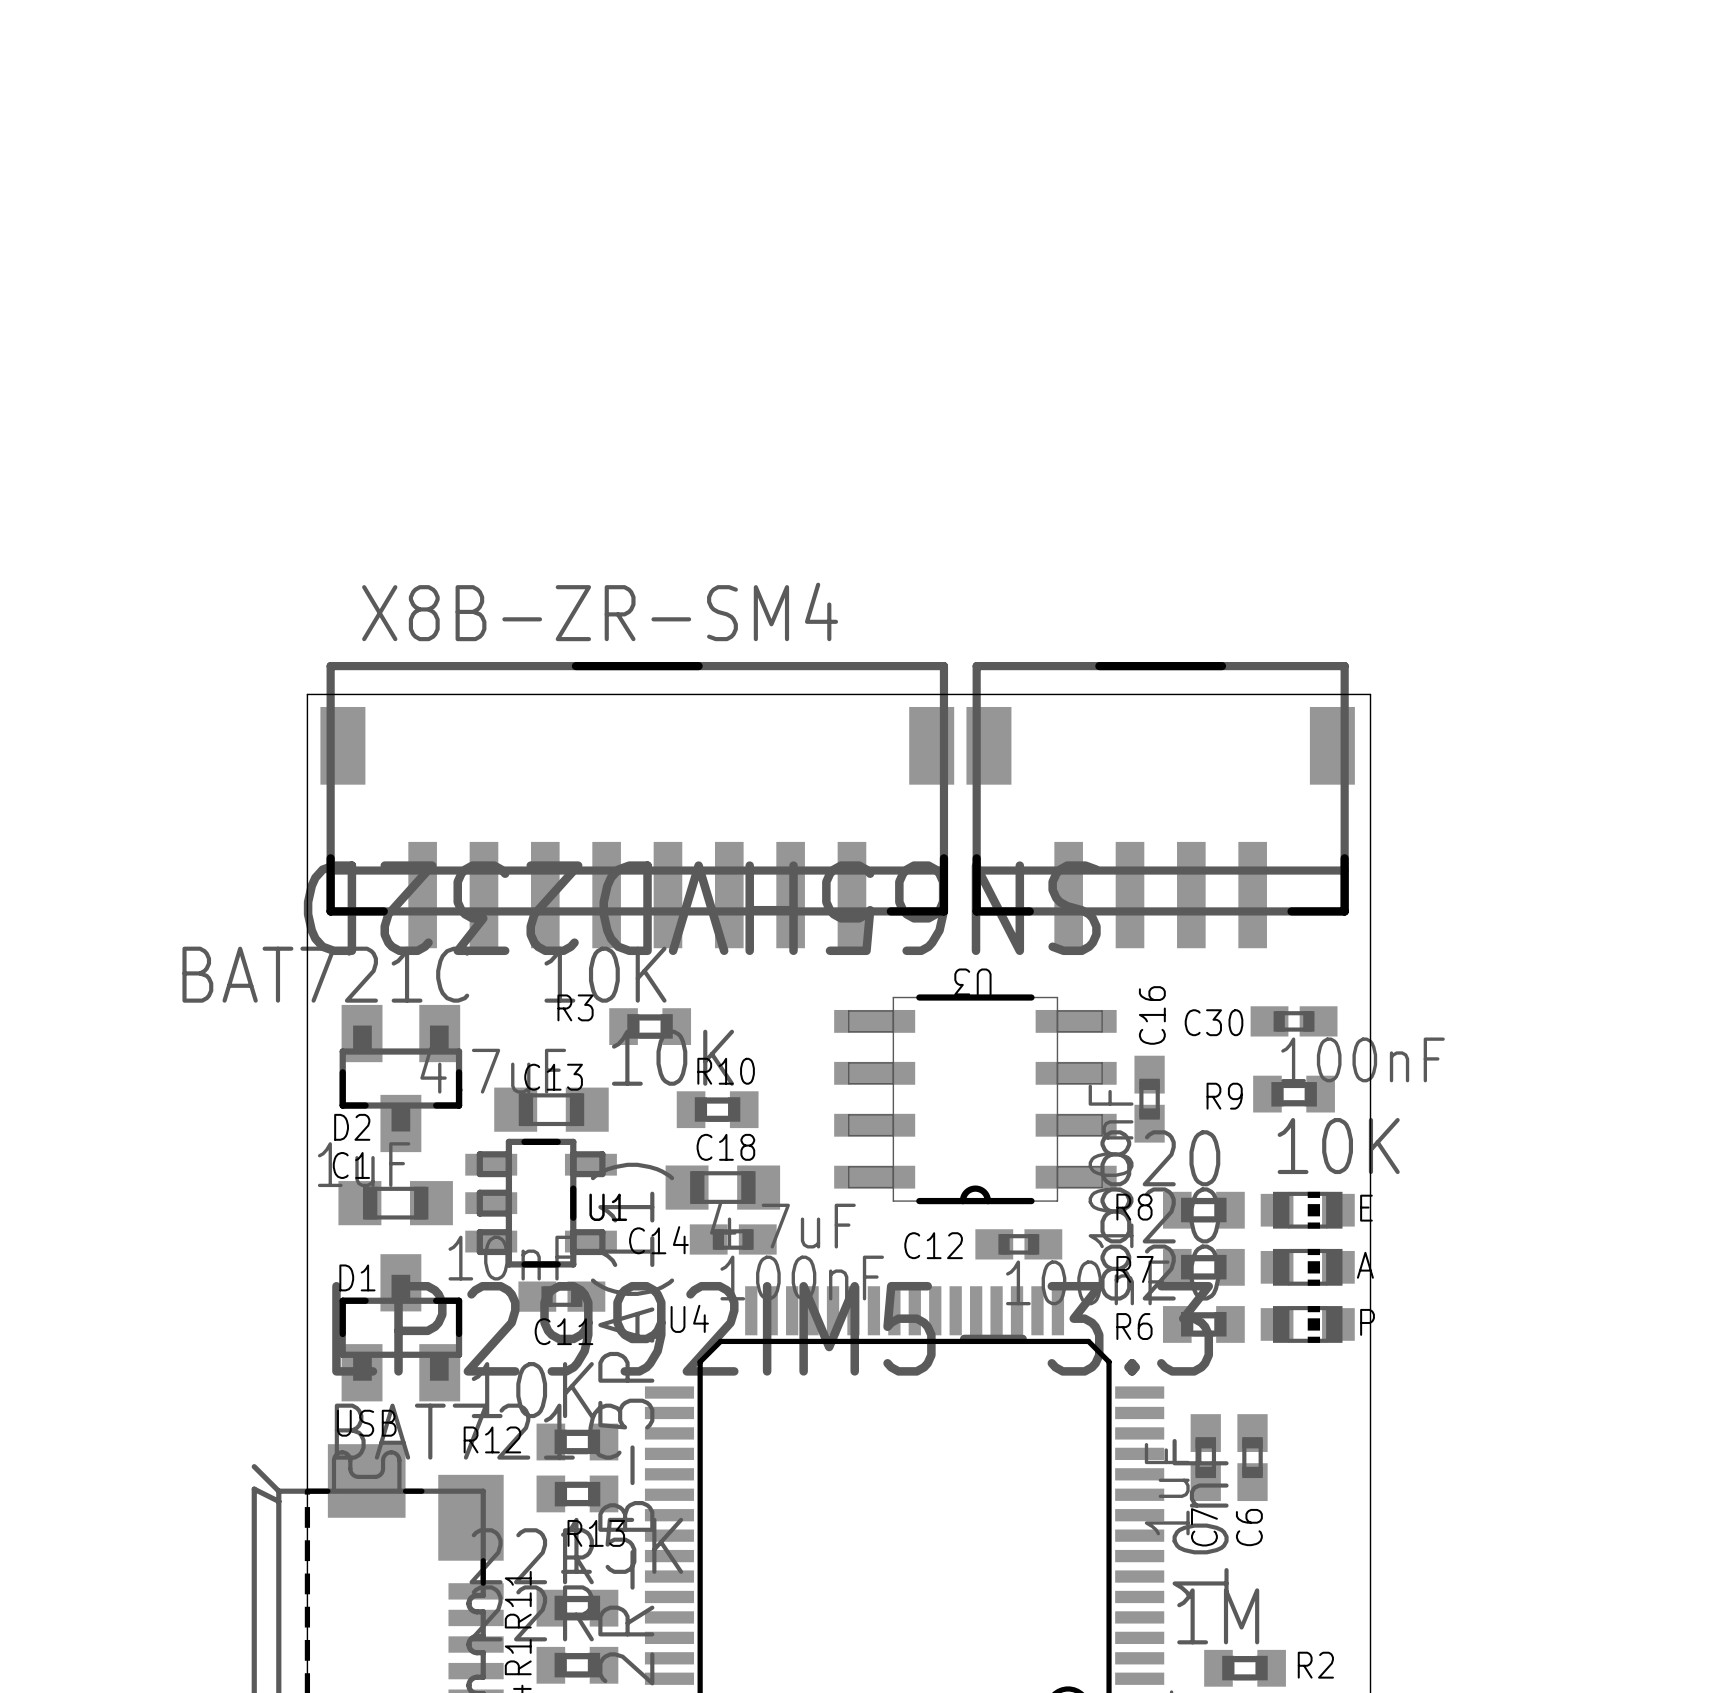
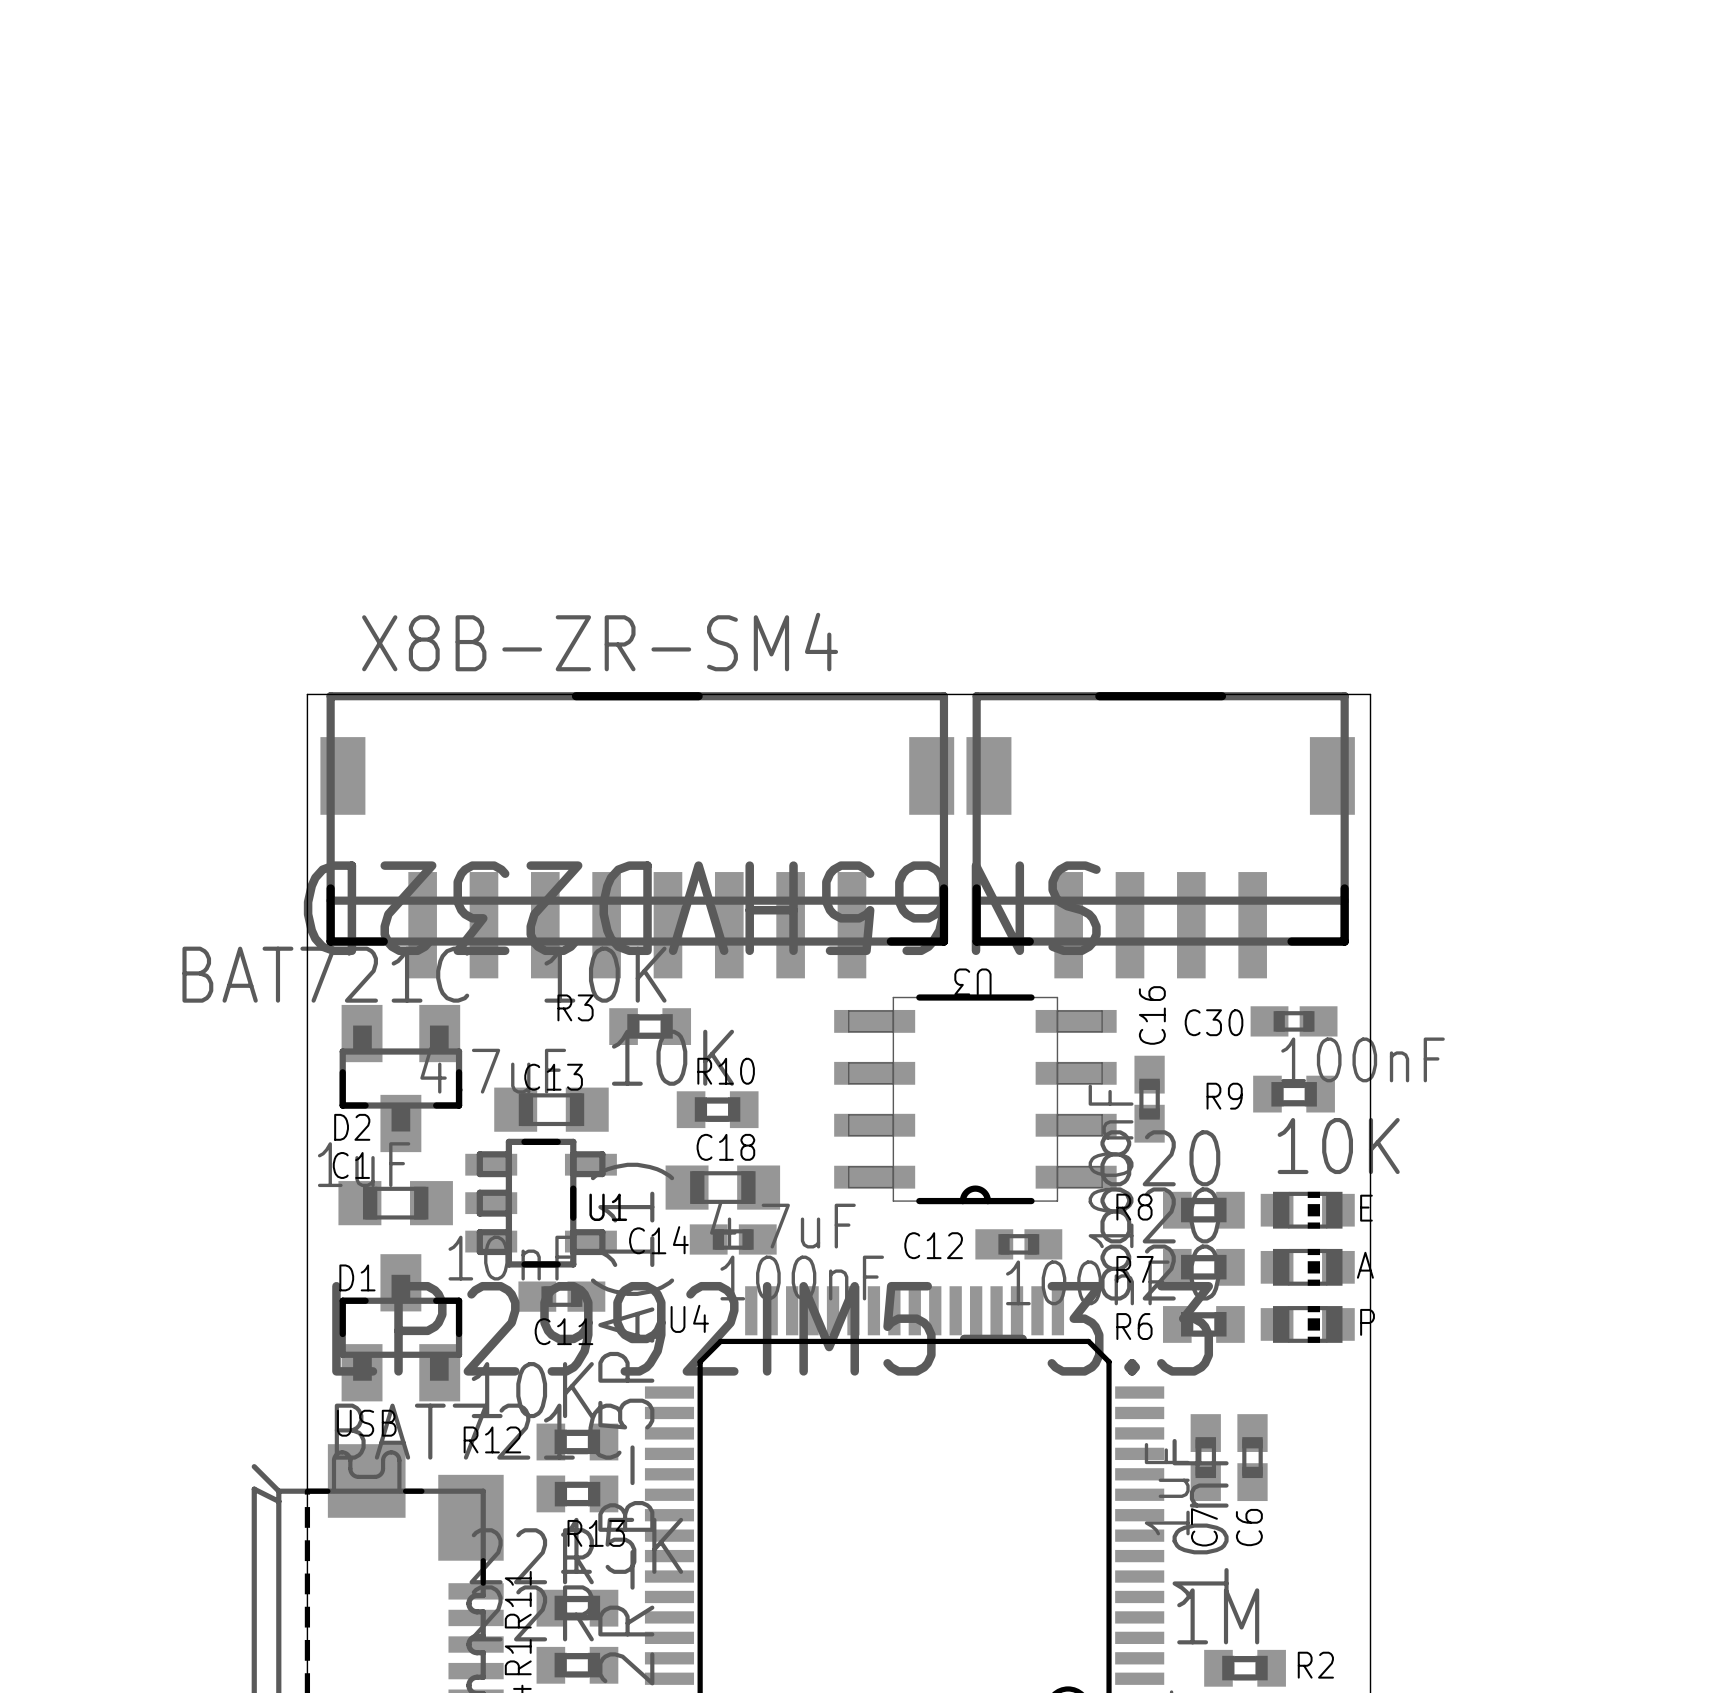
part position: (637, 805) -> (637, 835)
part position: (1160, 805) -> (1160, 835)

